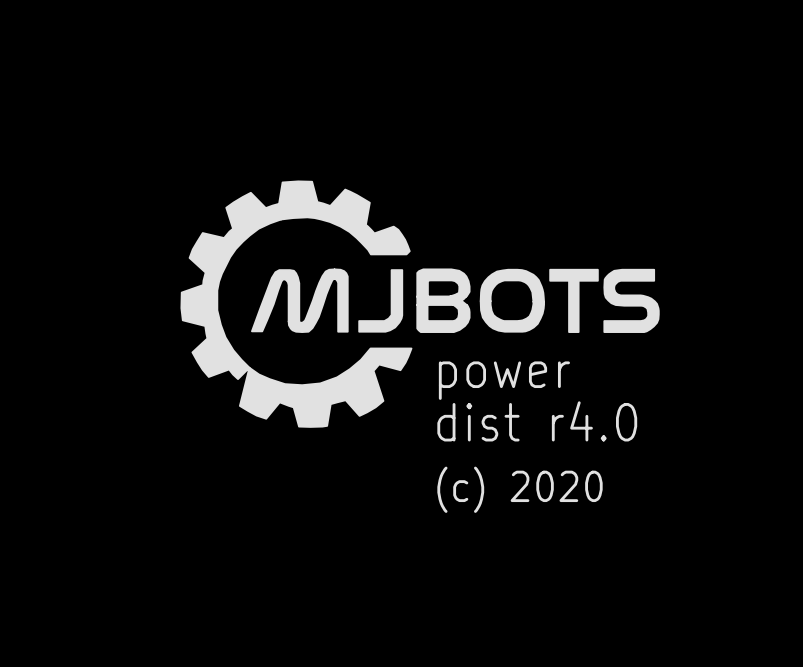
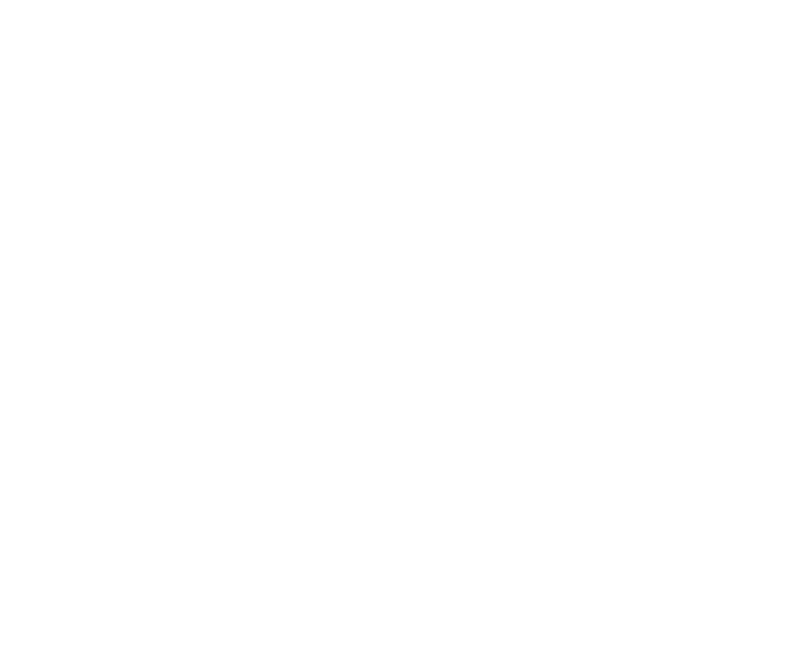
drawing: [180, 180, 660, 428] -> none
text: power (504, 380) -> none
text: dist r4.0 (537, 421) -> none
text: (c) 2020 (520, 489) -> none

